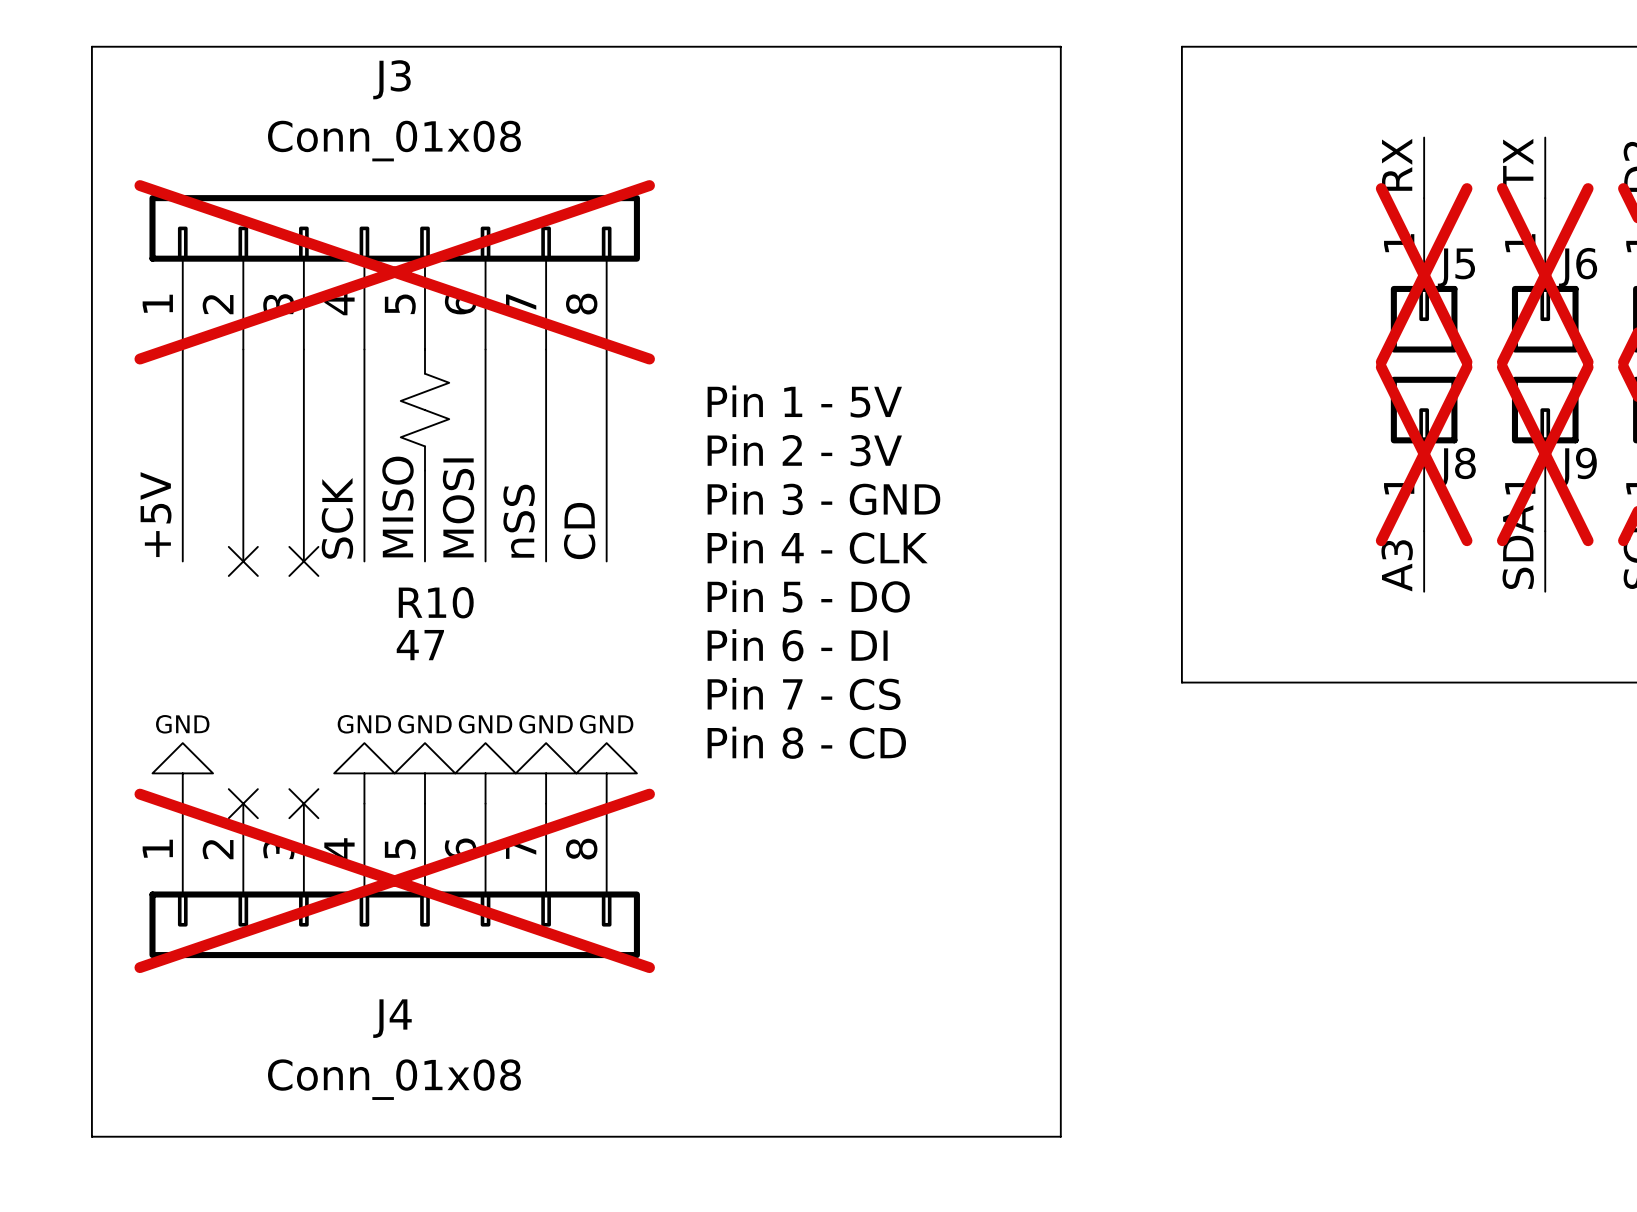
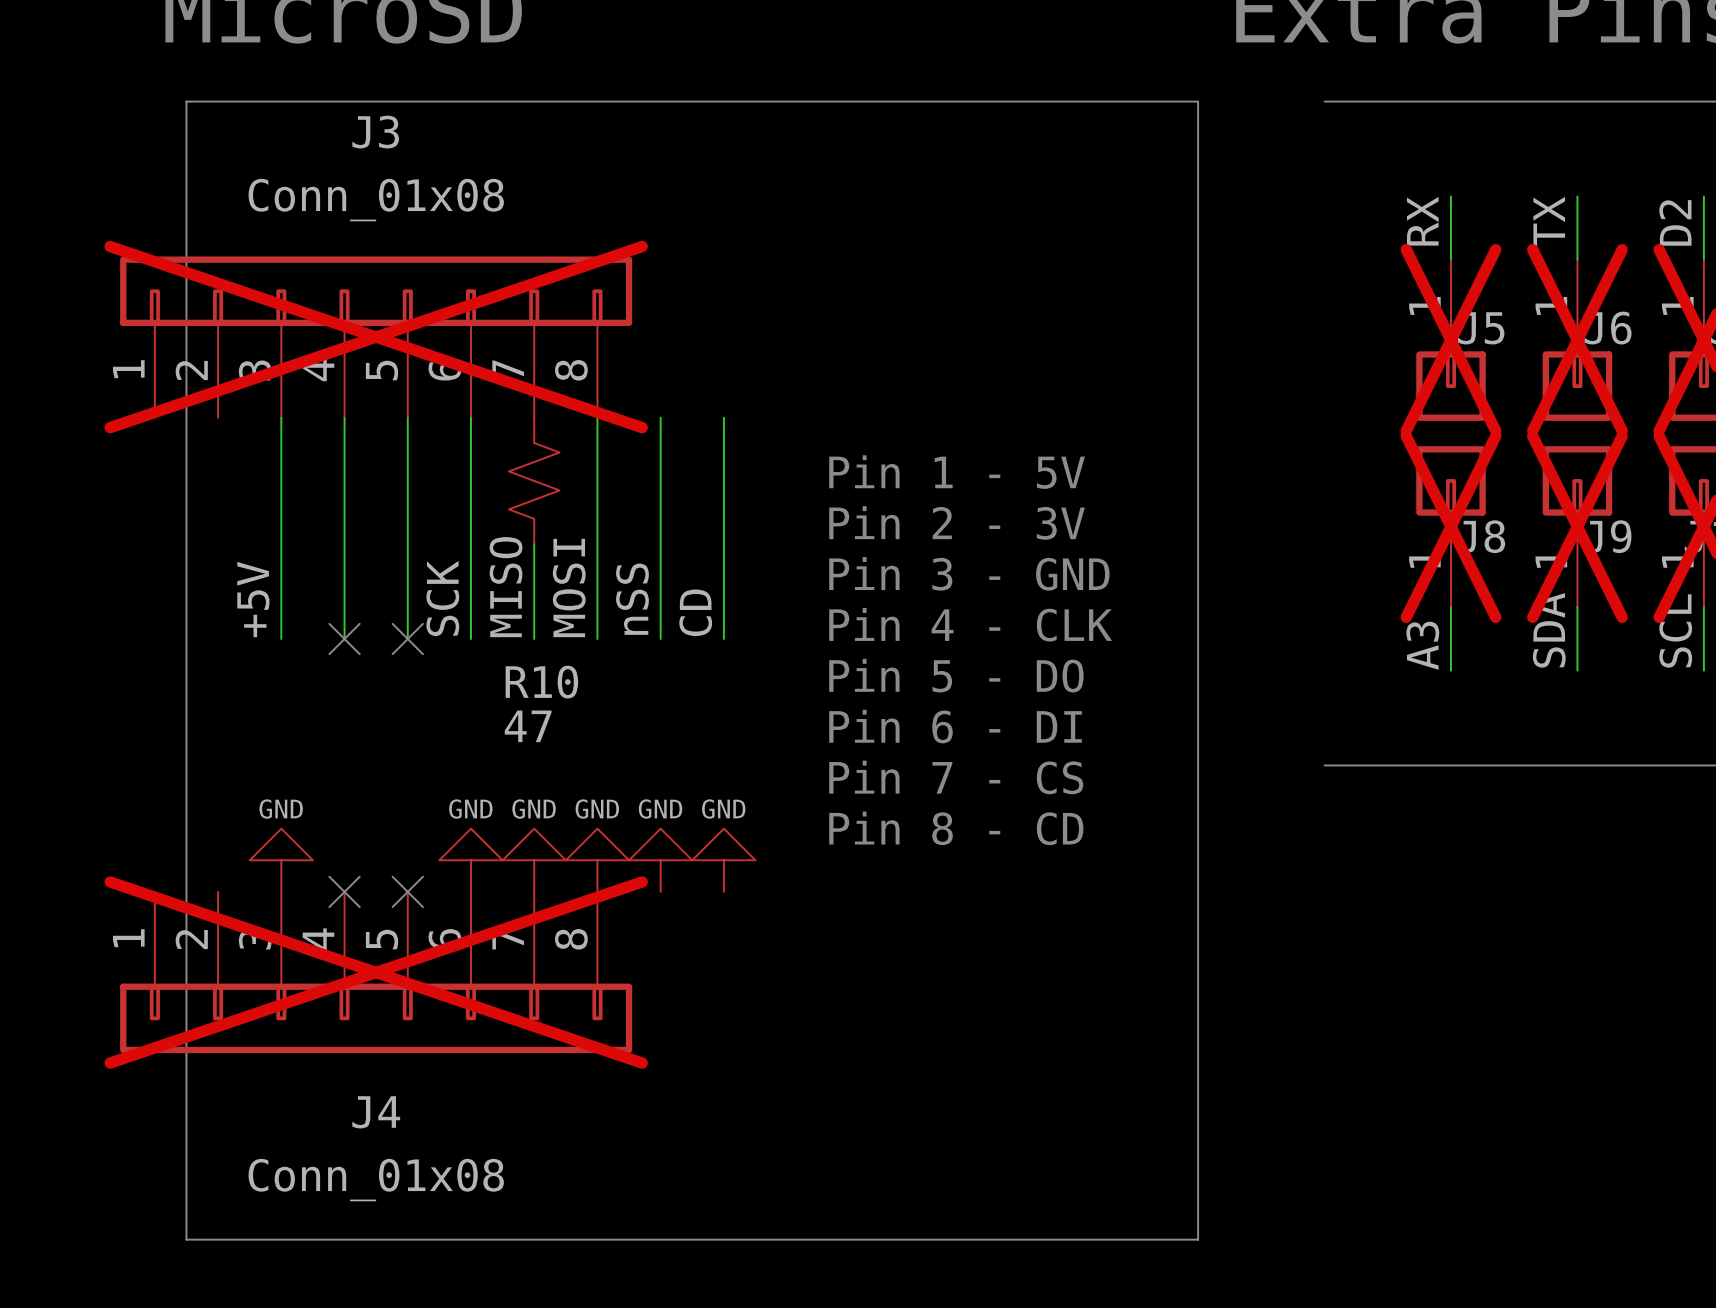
line: (213, 46) (91, 46) (91, 1136) (213, 1136) -> (186, 101) (186, 1239)
line: (1060, 46) (1060, 1136) -> none
line: (1181, 46) (1303, 46) -> (1198, 101) (1071, 101)
wire: (182, 349) (182, 561) -> (660, 417) (660, 639)
wire: (243, 349) (243, 561) -> (723, 417) (723, 639)
wire: (546, 349) (546, 470) -> (407, 417) (407, 544)
text position: Pin 1 - 5V (804, 401) -> Pin 1 - 5V (957, 472)
R10 position: (424, 410) -> (534, 480)
text position: Pin 2 - 3V (804, 450) -> Pin 2 - 3V (957, 522)
text position: Pin 3 - GND (823, 499) -> Pin 3 - GND (969, 573)
label: MISO (398, 507) -> none
label: MOSI (458, 507) -> SCK (442, 598)
label position: +5V (156, 514) -> +5V (253, 599)
label: SCK (337, 518) -> none
label: nSS (519, 521) -> MISO (506, 587)
label: none -> nSS (632, 599)
label: CD (579, 531) -> MOSI (569, 588)
label: none -> CD (695, 612)
text position: Pin 4 - CLK (817, 547) -> Pin 4 - CLK (970, 624)
no-connect mark: (243, 561) -> none
no-connect mark: (303, 561) -> none
no-connect mark: none -> (344, 639)
no-connect mark: none -> (407, 639)
text position: Pin 5 - DO (808, 596) -> Pin 5 - DO (956, 675)
text position: Pin 6 - DI (797, 645) -> Pin 6 - DI (955, 726)
line: (1181, 682) (1303, 682) -> (1198, 765) (1198, 1239) (1071, 1239)
text position: Pin 7 - CS (804, 694) -> Pin 7 - CS (956, 777)
text position: Pin 8 - CD (806, 742) -> Pin 8 - CD (956, 828)
power symbol: GND (182, 773) -> none
power symbol: none -> GND (281, 860)
power symbol: GND (364, 773) -> none
power symbol: GND (424, 773) -> none
power symbol: none -> GND (660, 860)
power symbol: none -> GND (723, 860)
no-connect mark: (243, 803) -> none
no-connect mark: (303, 803) -> none
no-connect mark: none -> (344, 891)
no-connect mark: none -> (407, 891)

